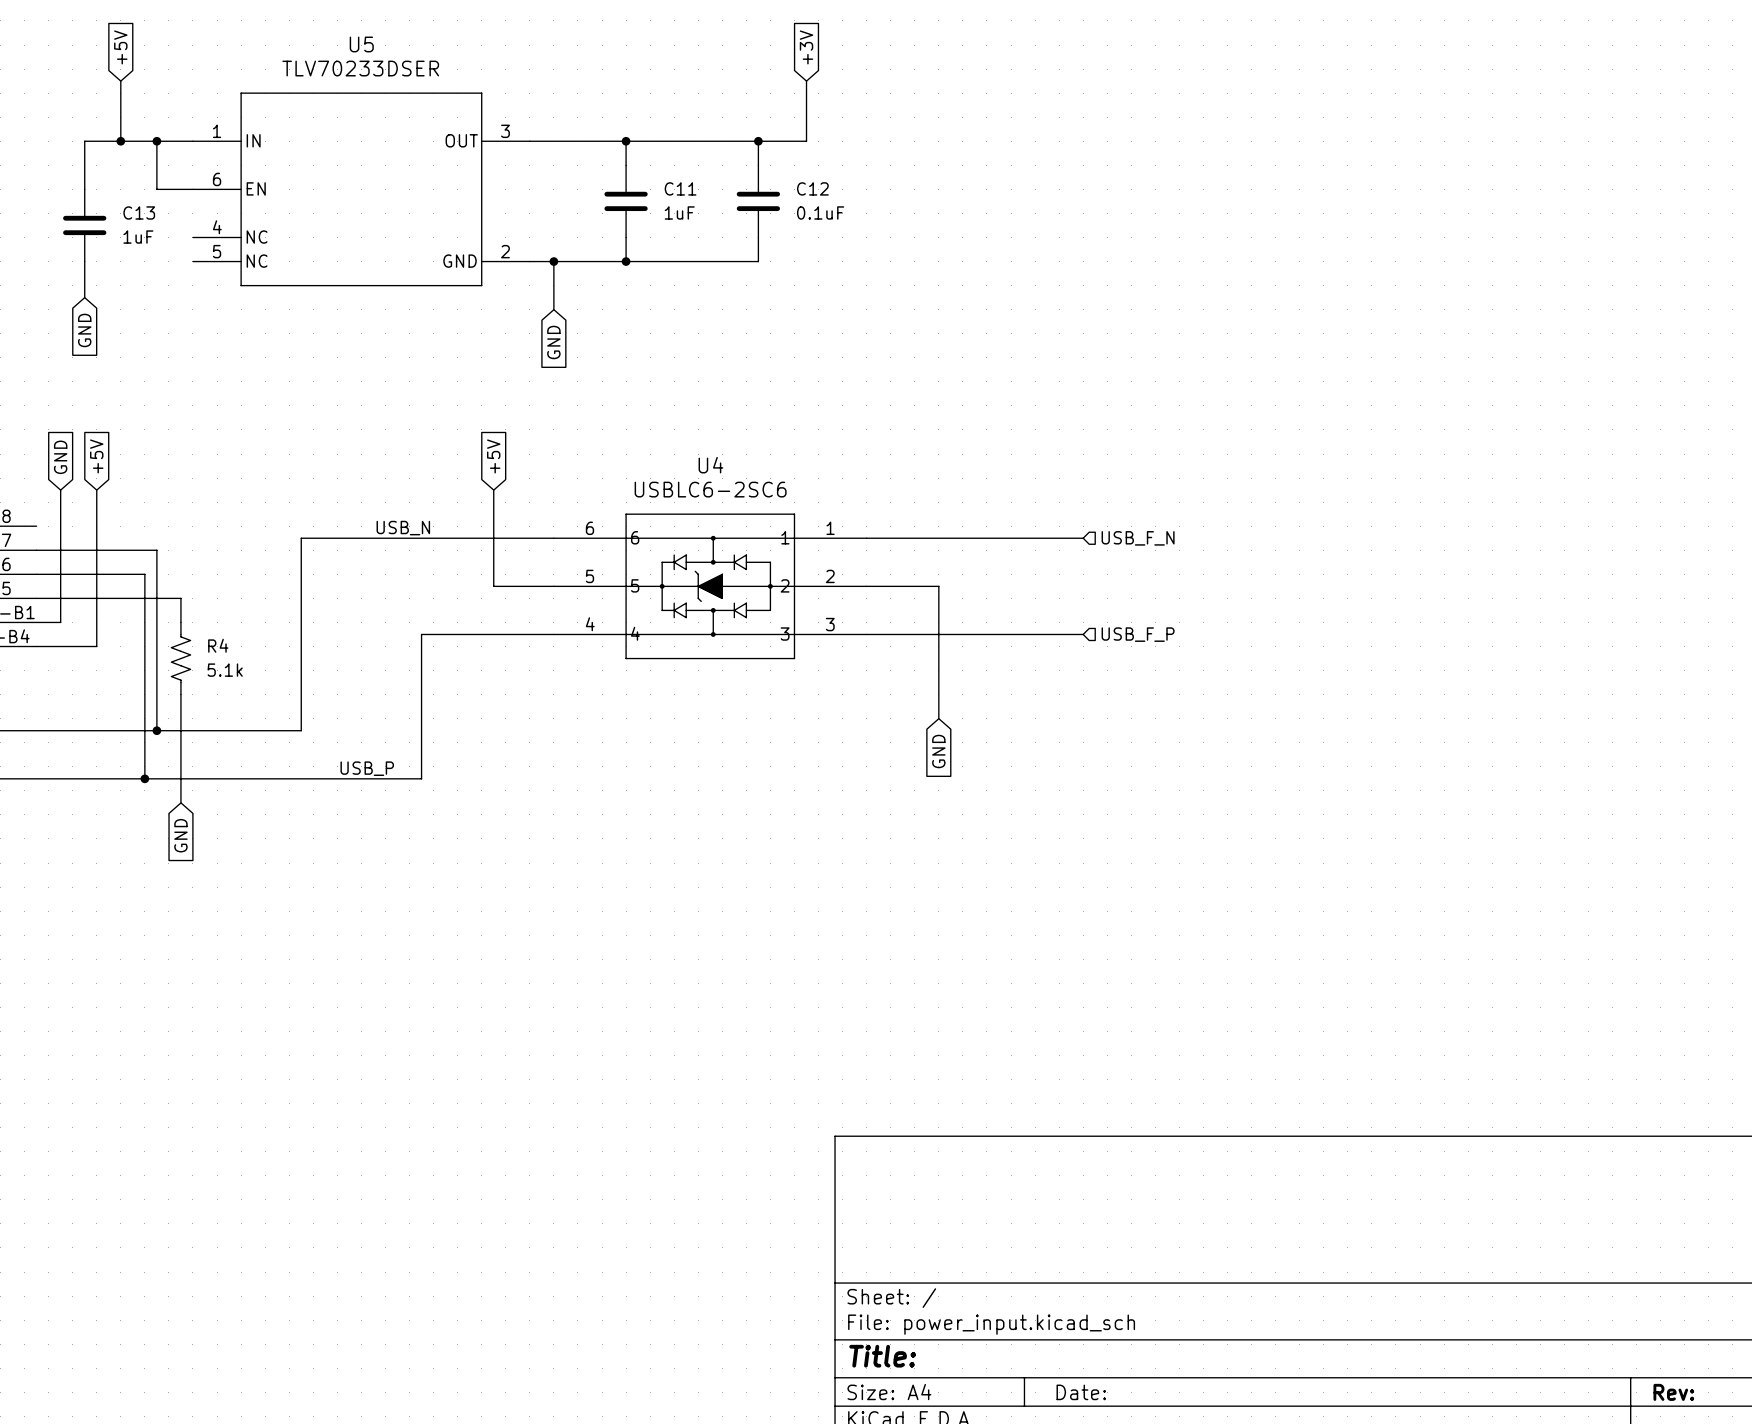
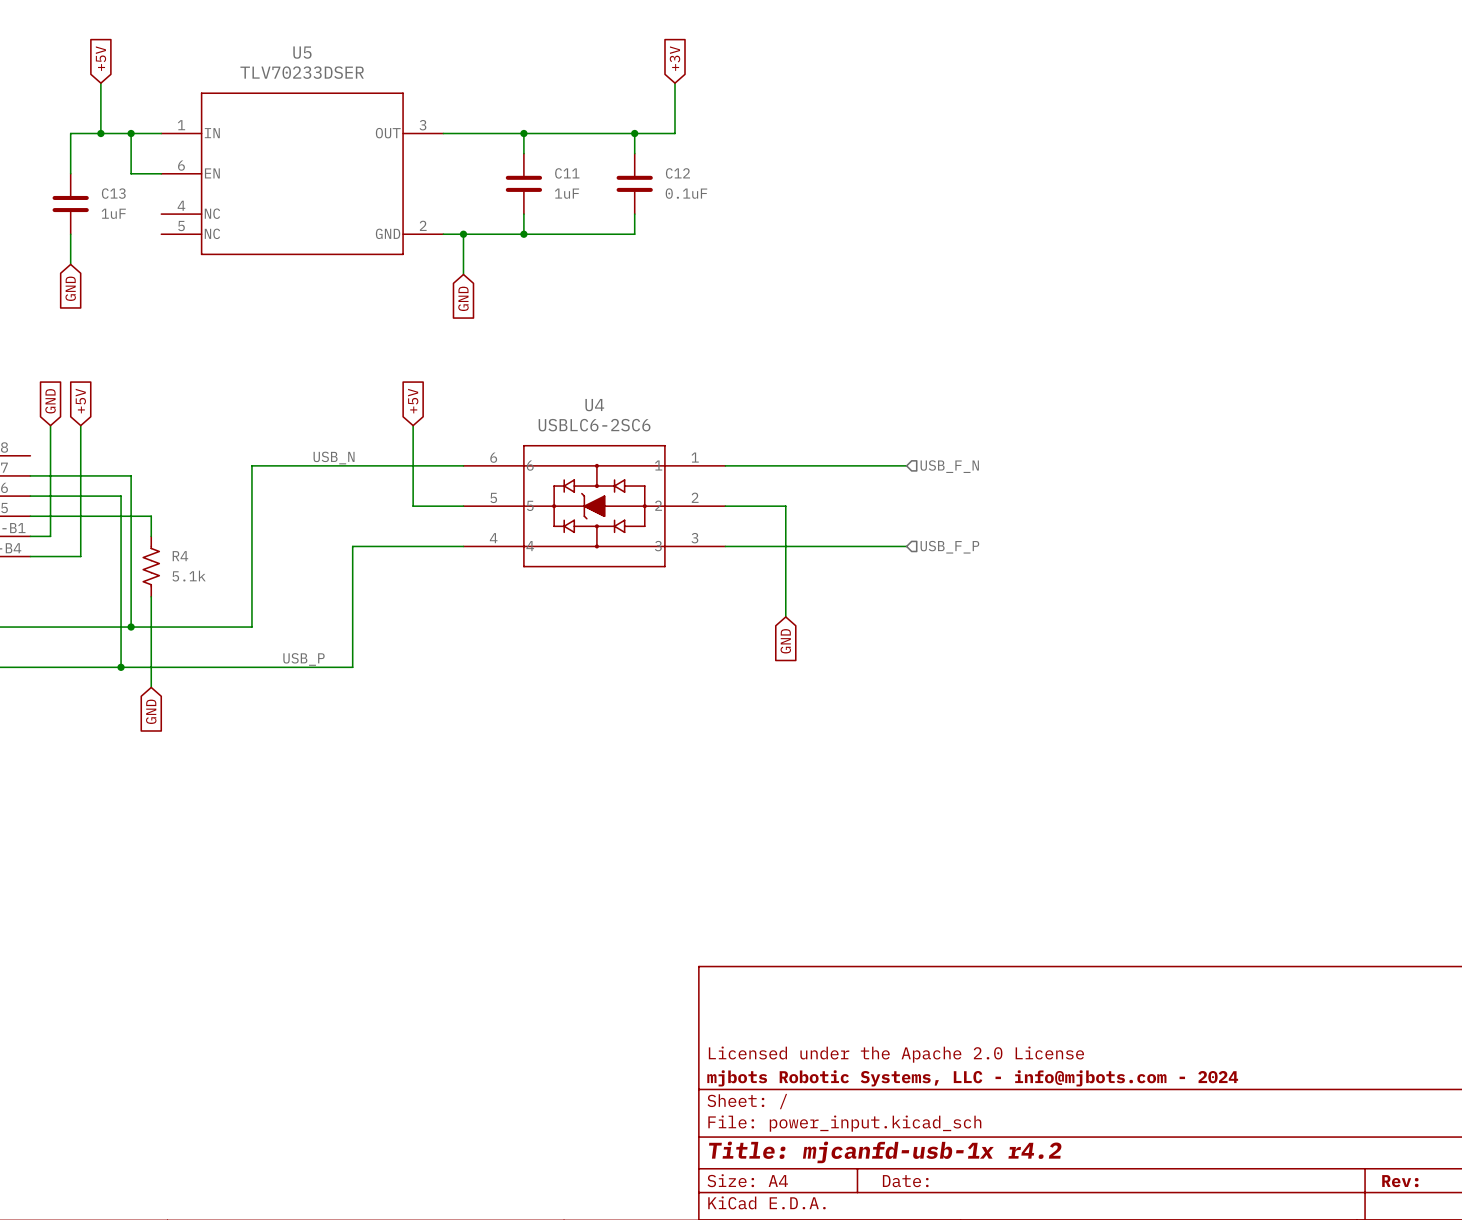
title block: none -> Licensed under the Apache 2.0 License (896, 1054)
title block: none -> mjbots Robotic Systems, LLC - info@mjbots.com - 2024 (972, 1078)
title block: Title: (882, 1356) -> Title: mjcanfd-usb-1x r4.2 (885, 1152)

